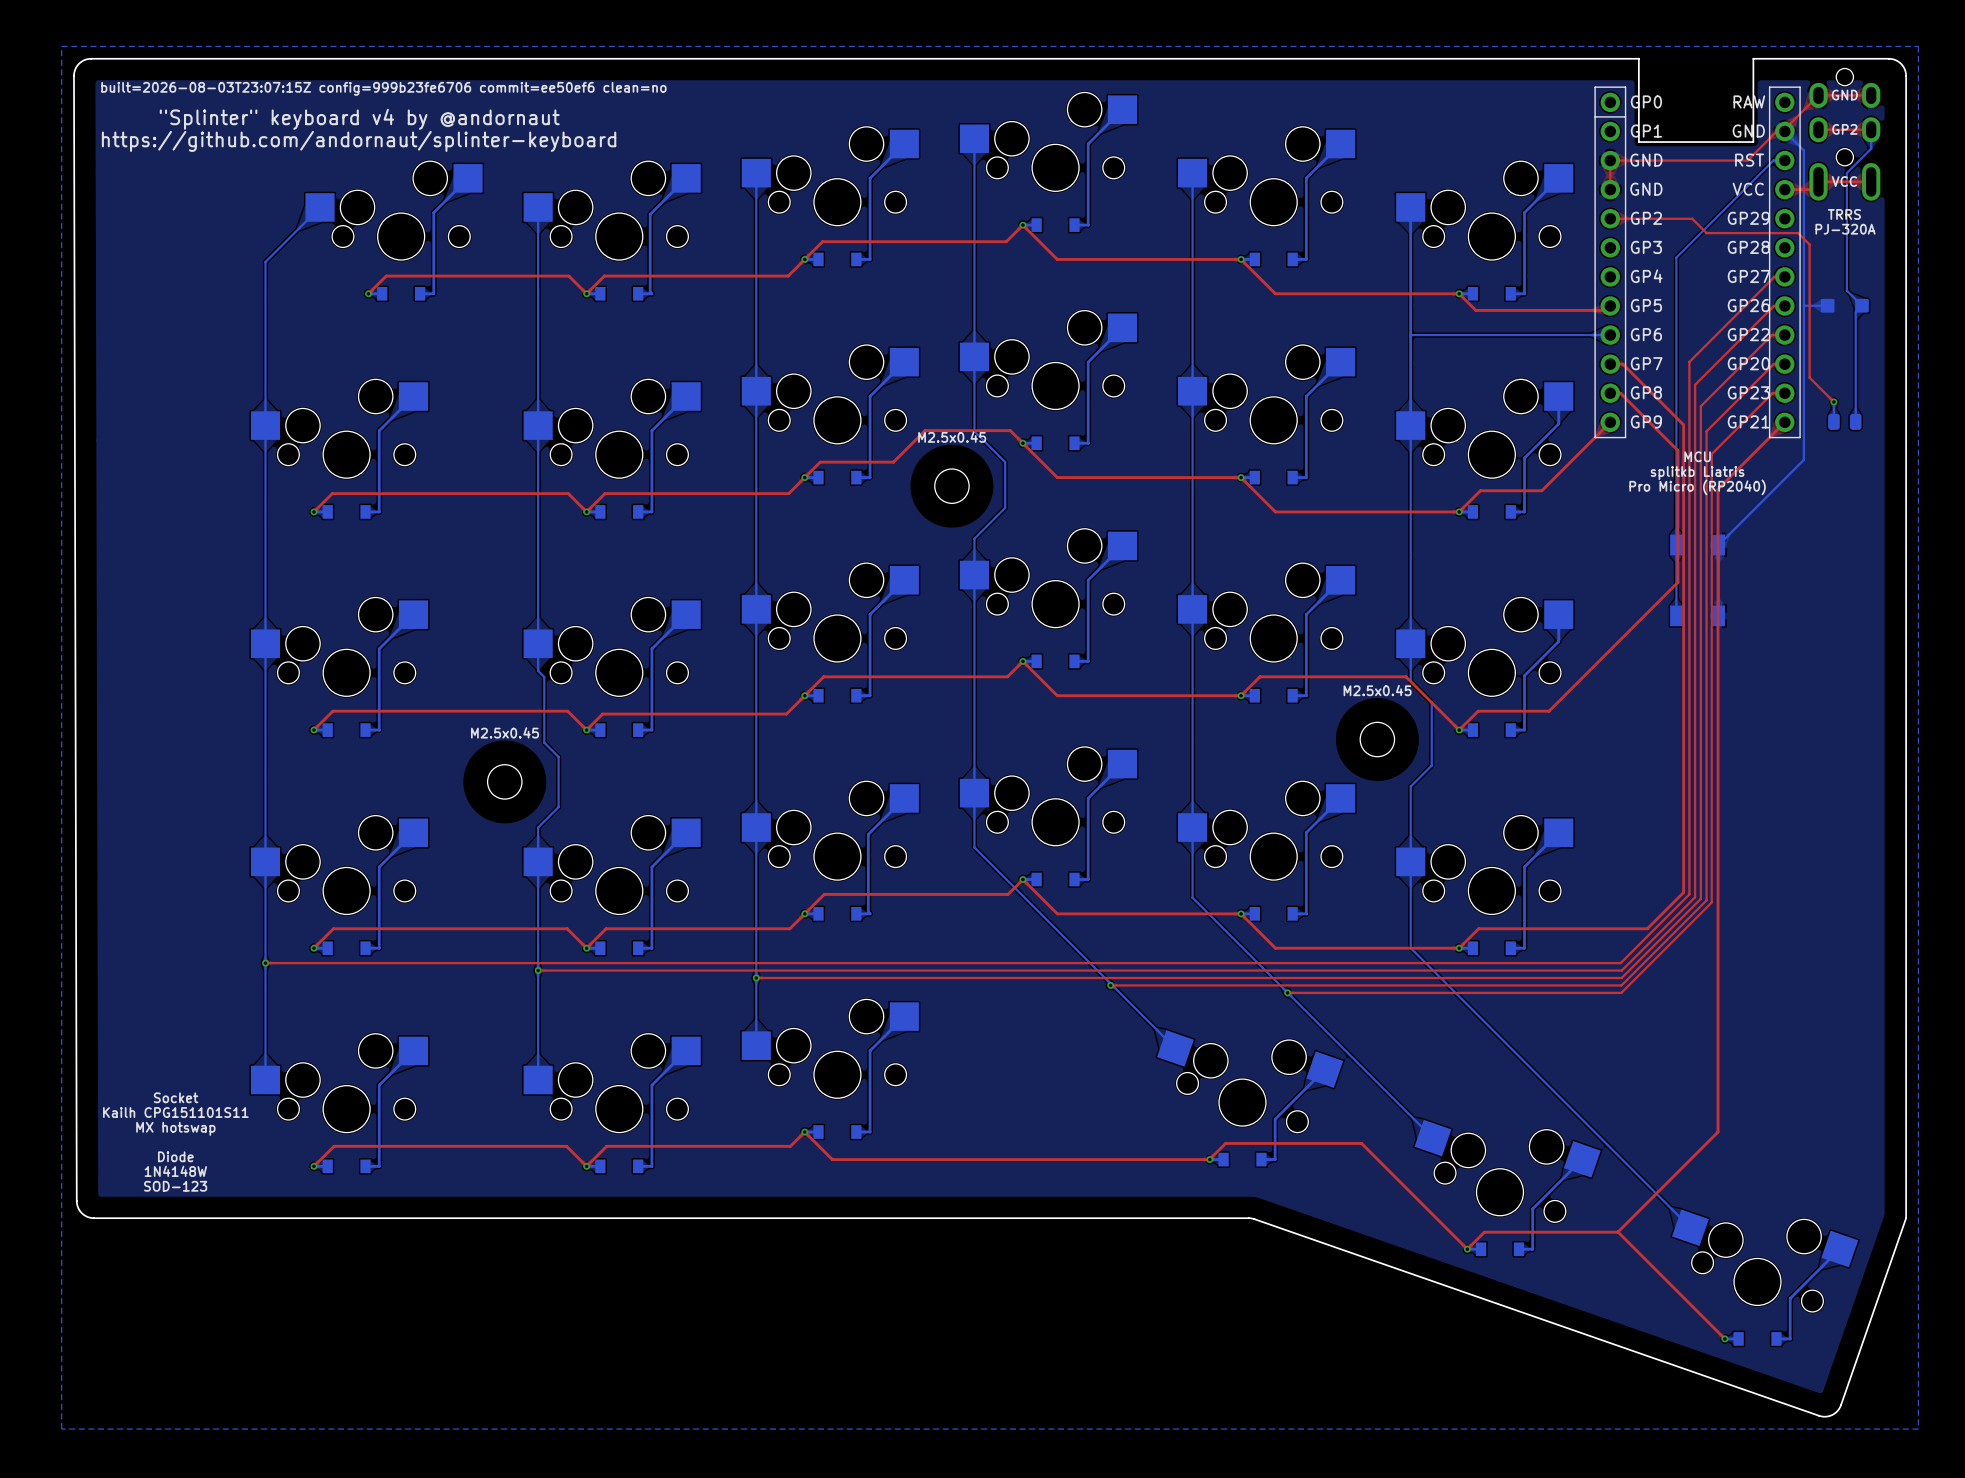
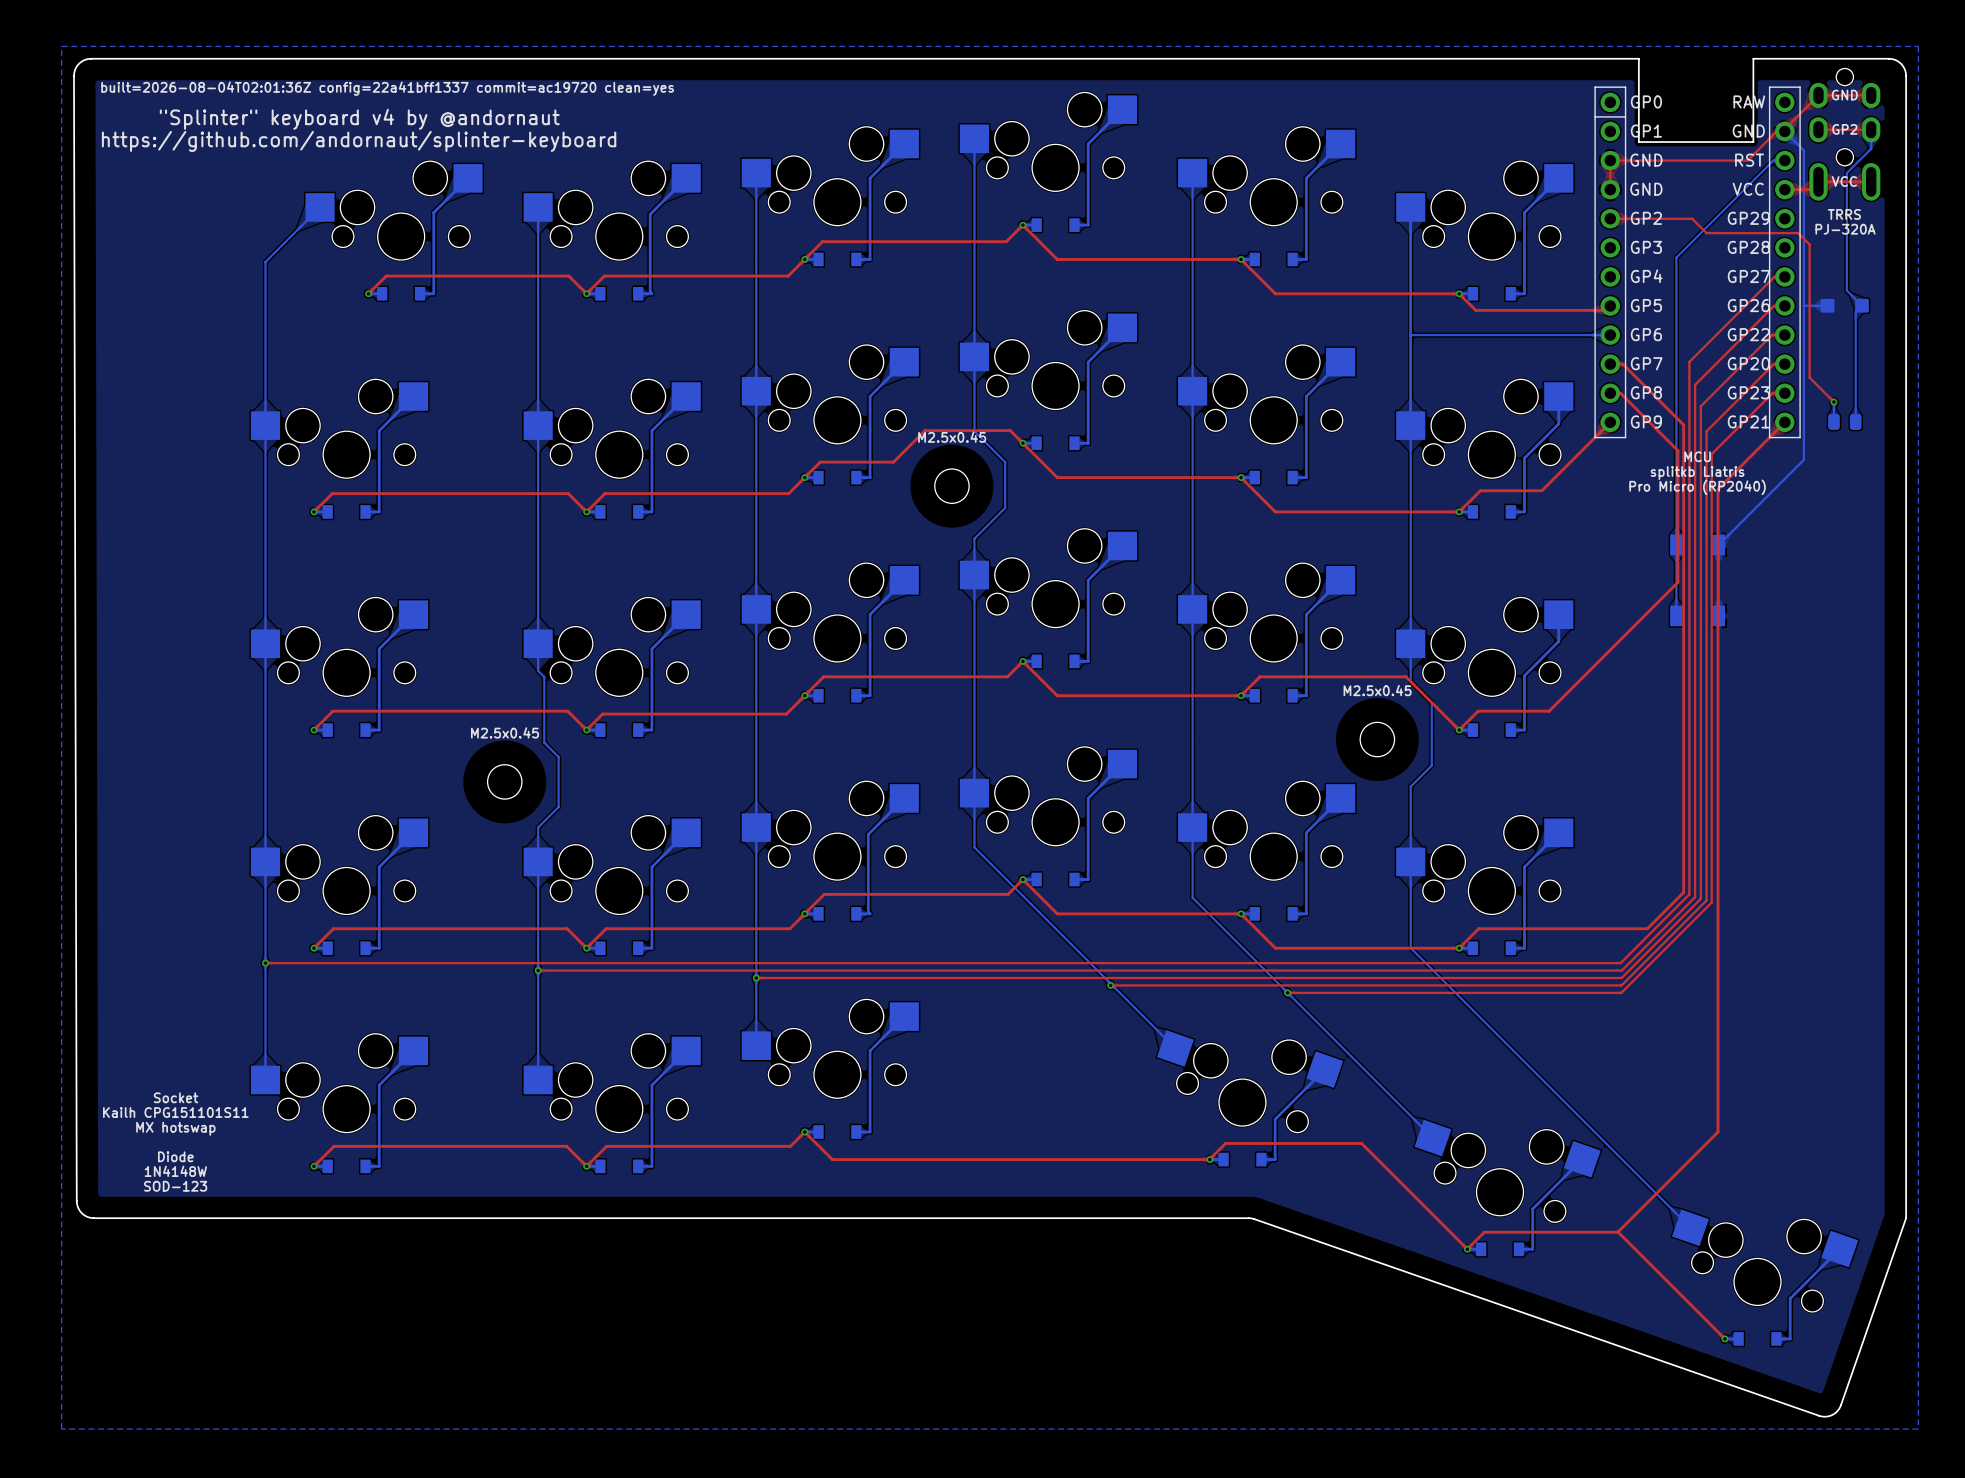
text: built=2026-08-03T23:07:15Z config=999b23fe6706 commit=ee50ef6 clean=no (383, 88) -> built=2026-08-04T02:01:36Z config=22a41bff1337 commit=ac19720 clean=yes (387, 88)

